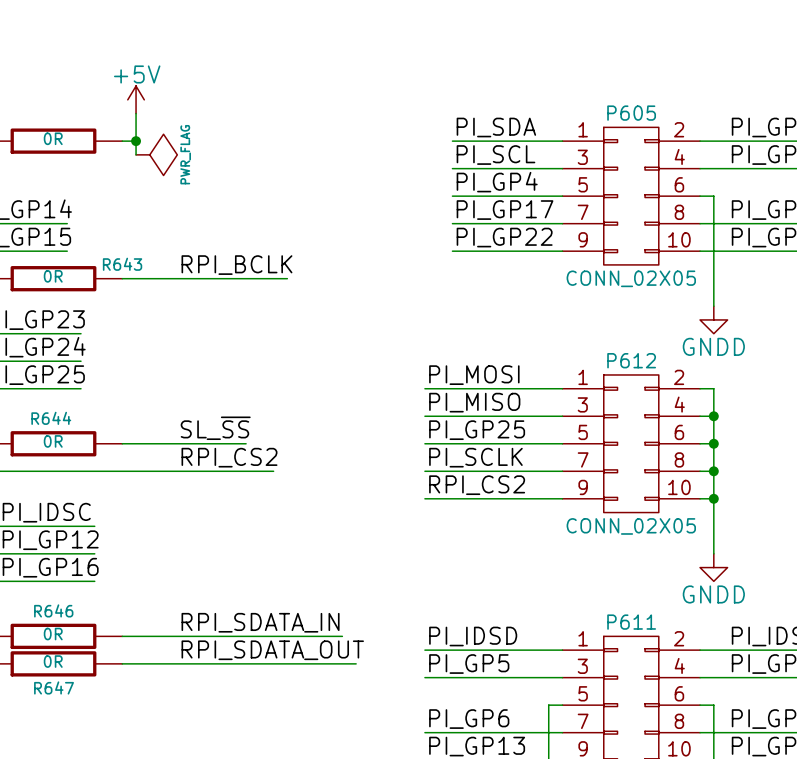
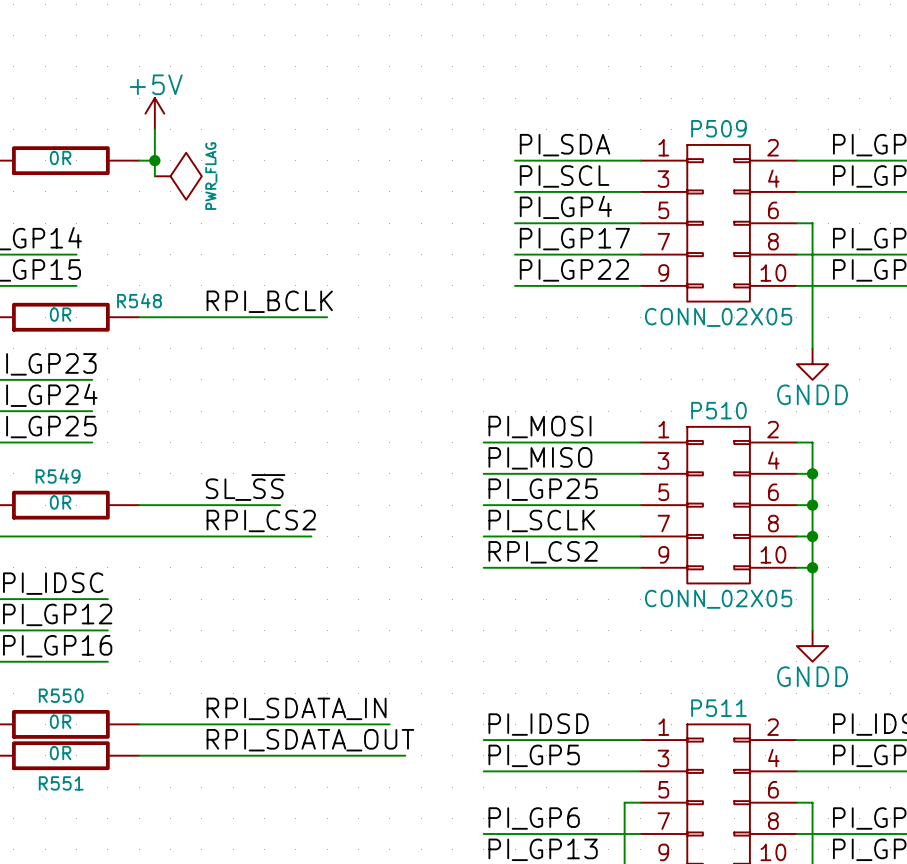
P605 name: P605 (631, 113) -> P509 (718, 128)
R643 name: R643 (122, 264) -> R548 (139, 300)
P612 name: P612 (631, 360) -> P510 (718, 410)
R644 name: R644 (51, 418) -> R549 (58, 476)
R646 name: R646 (53, 610) -> R550 (61, 695)
P611 name: P611 (631, 622) -> P511 (718, 708)
R647 name: R647 (54, 687) -> R551 (61, 783)

